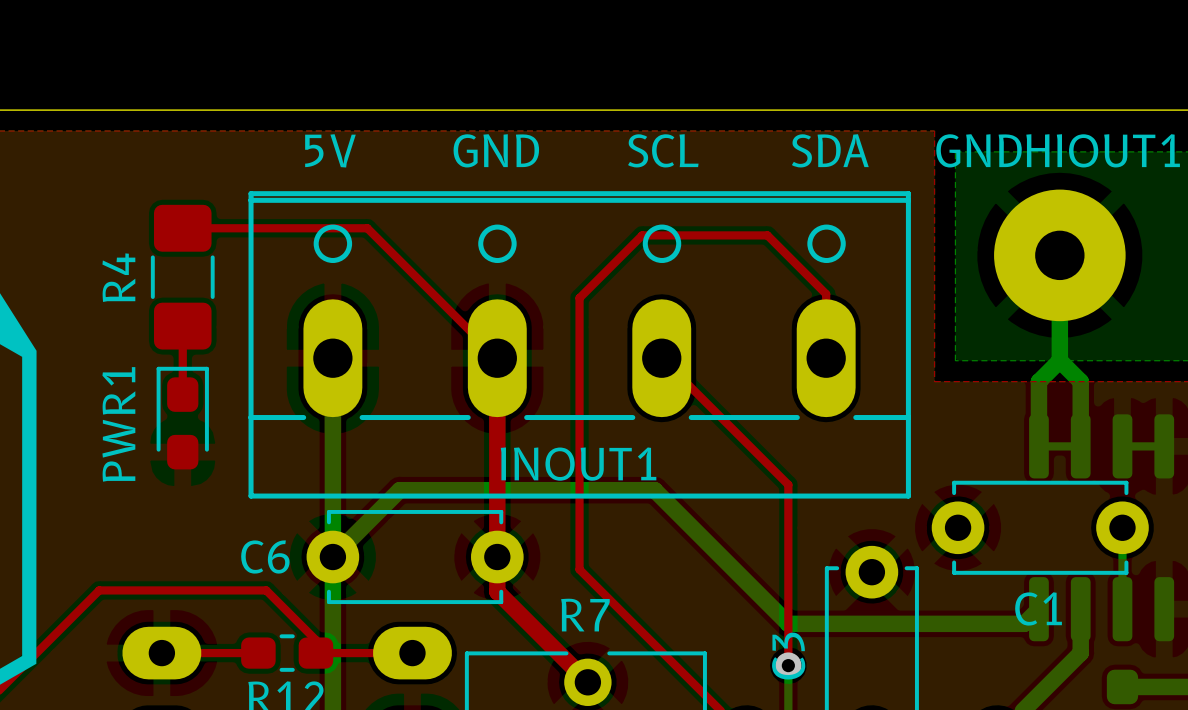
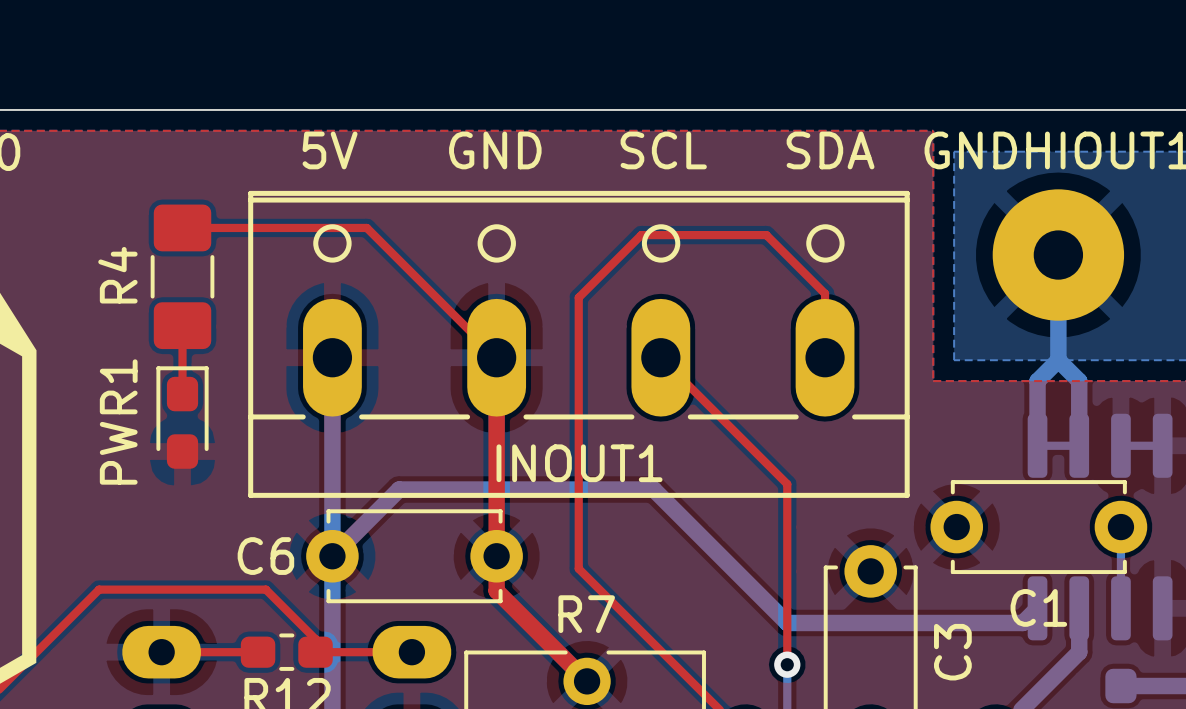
C3 name position: C3 (788, 656) -> C3 (952, 652)

